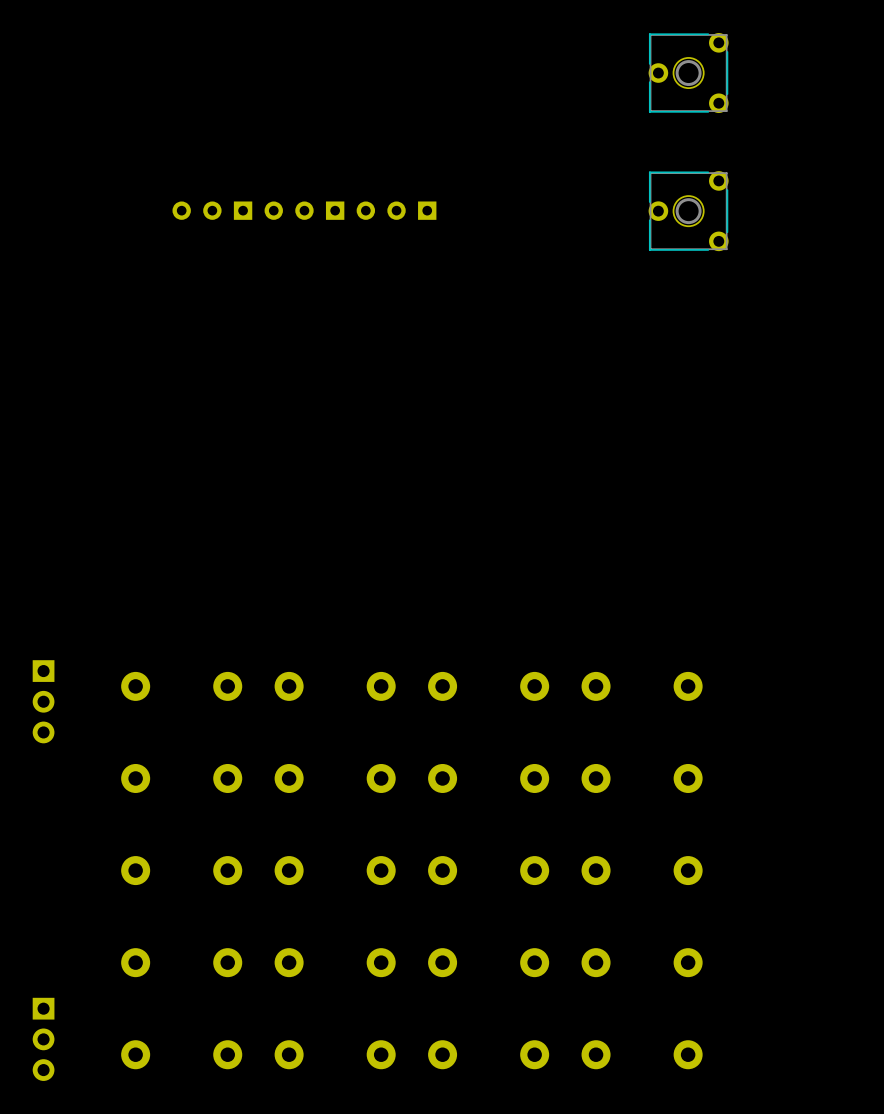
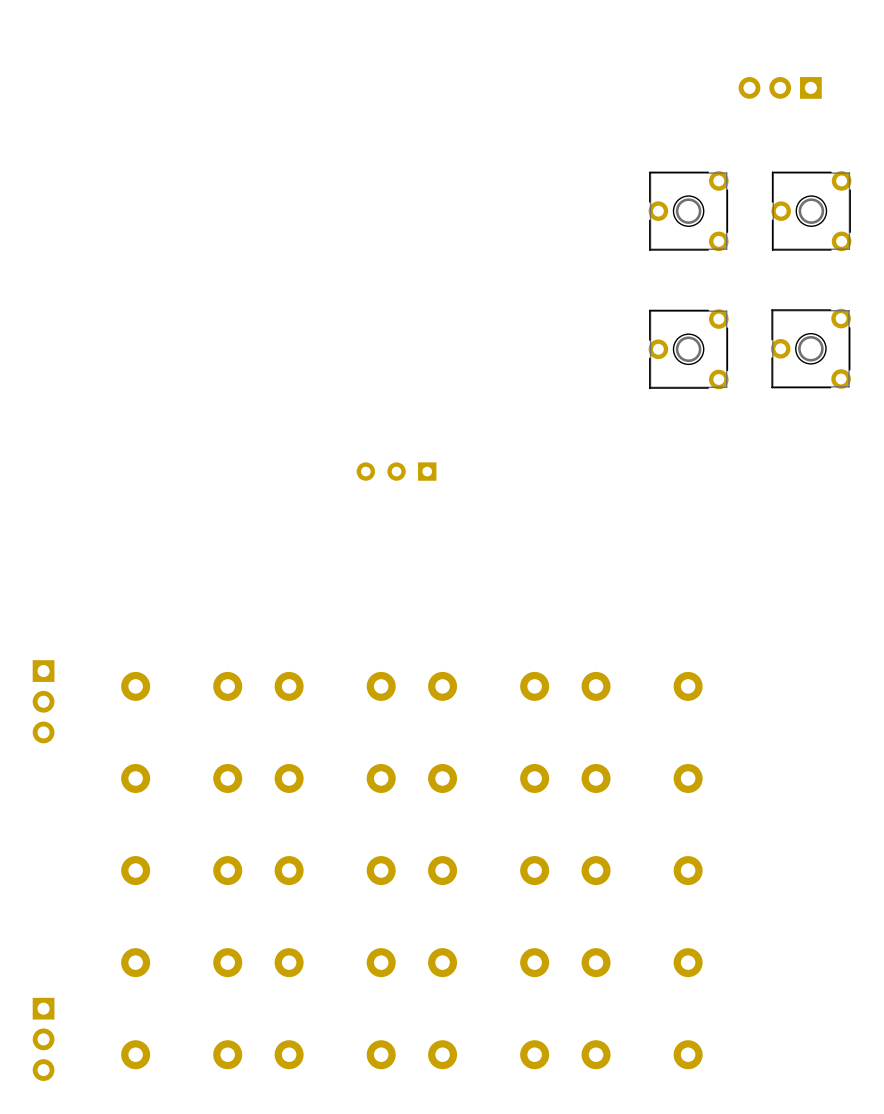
part: (688, 73) -> none
part: none -> (780, 87)
part: (212, 210) -> none
part: (304, 210) -> none
part: (396, 210) -> none
part: none -> (811, 211)
part: none -> (810, 348)
part: none -> (688, 349)
part: none -> (396, 471)

